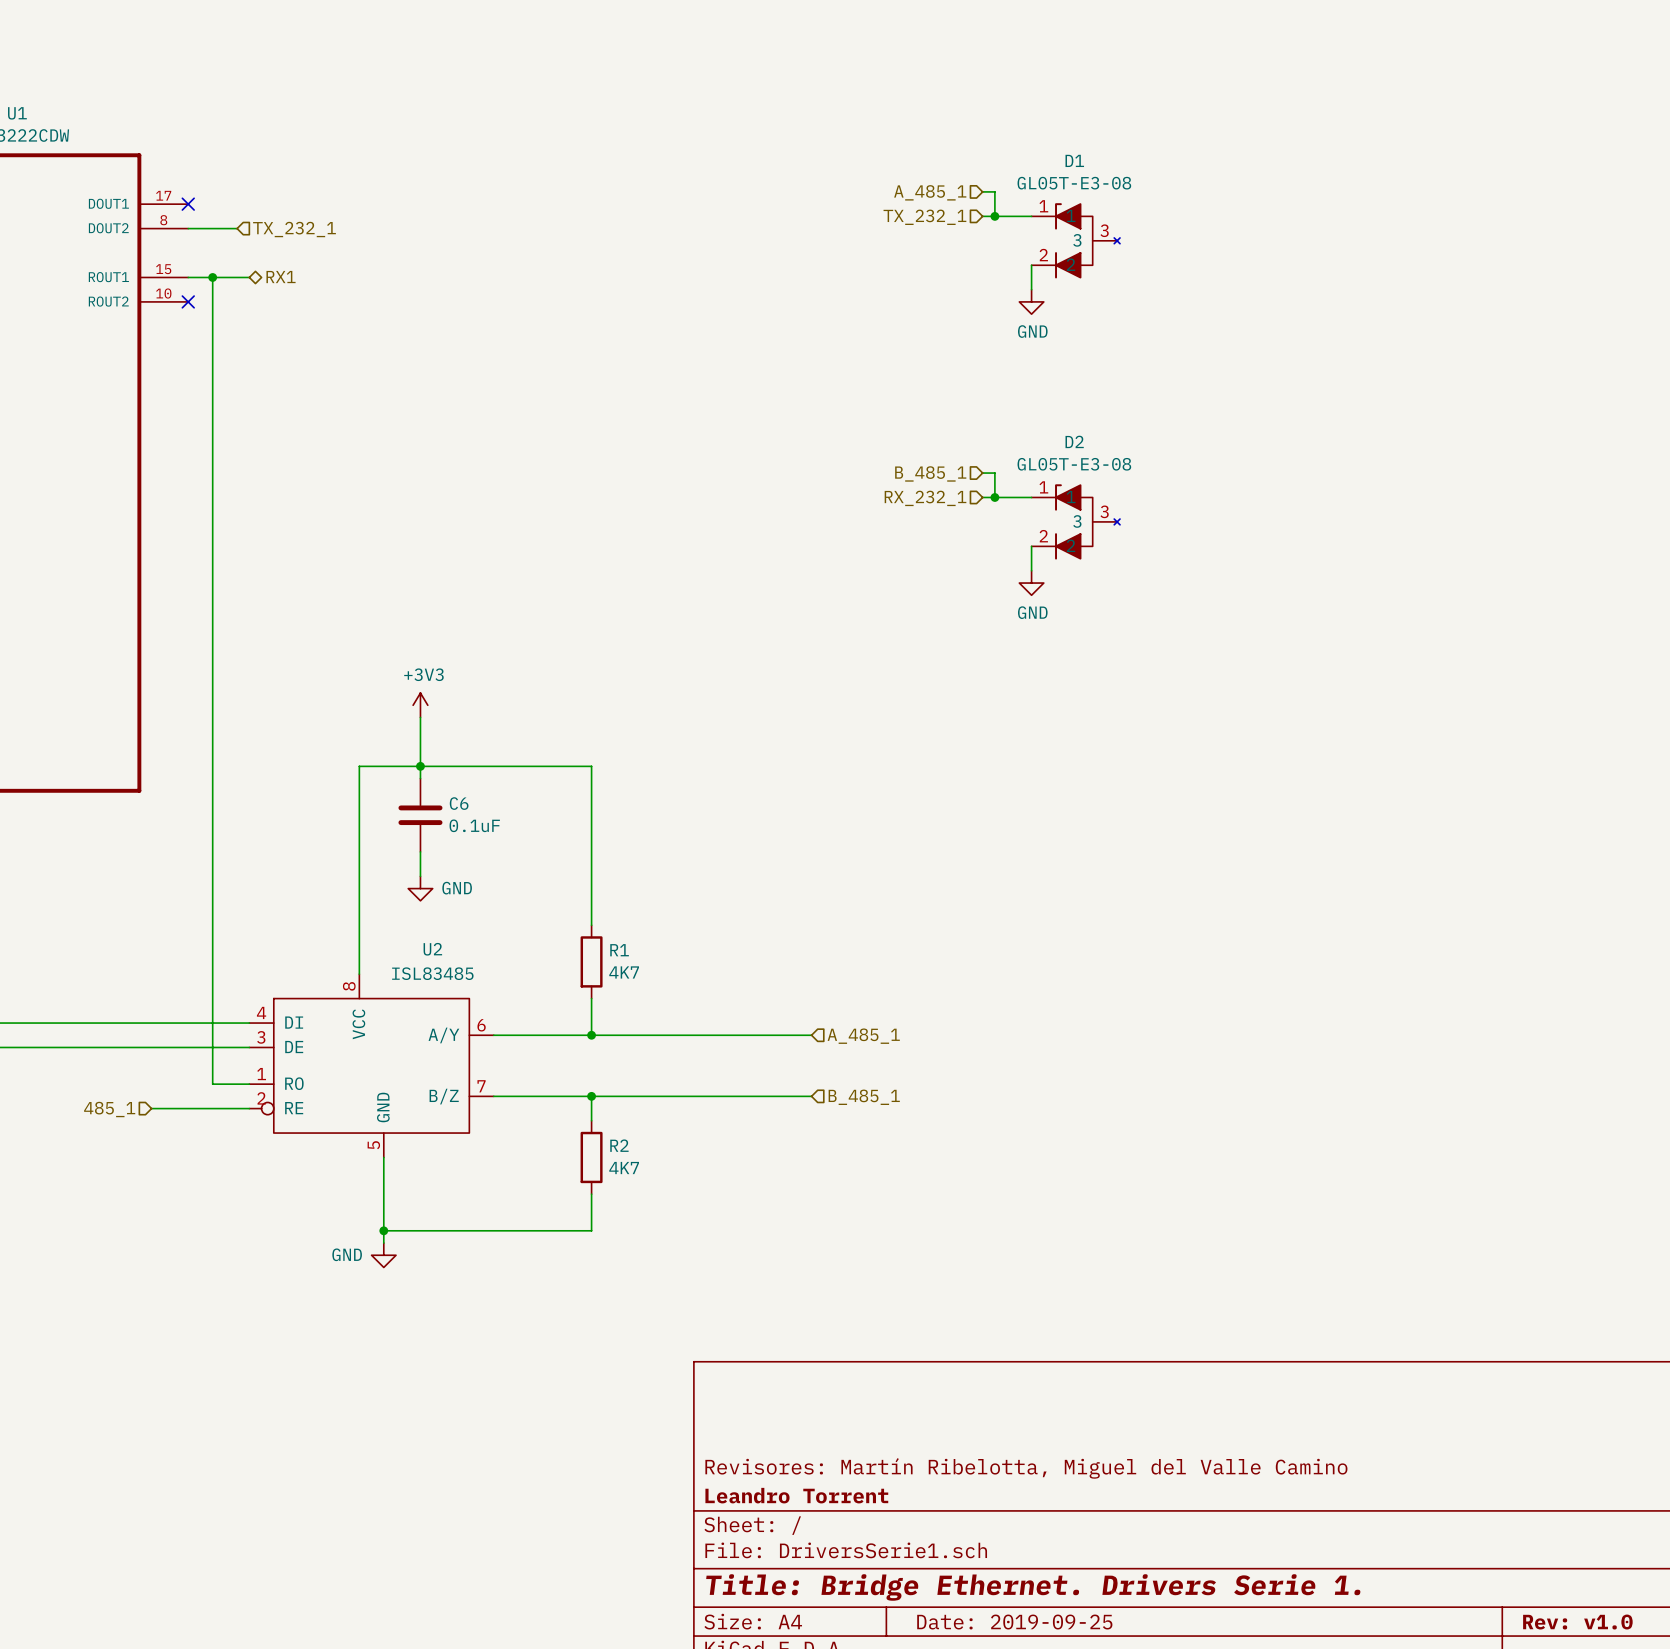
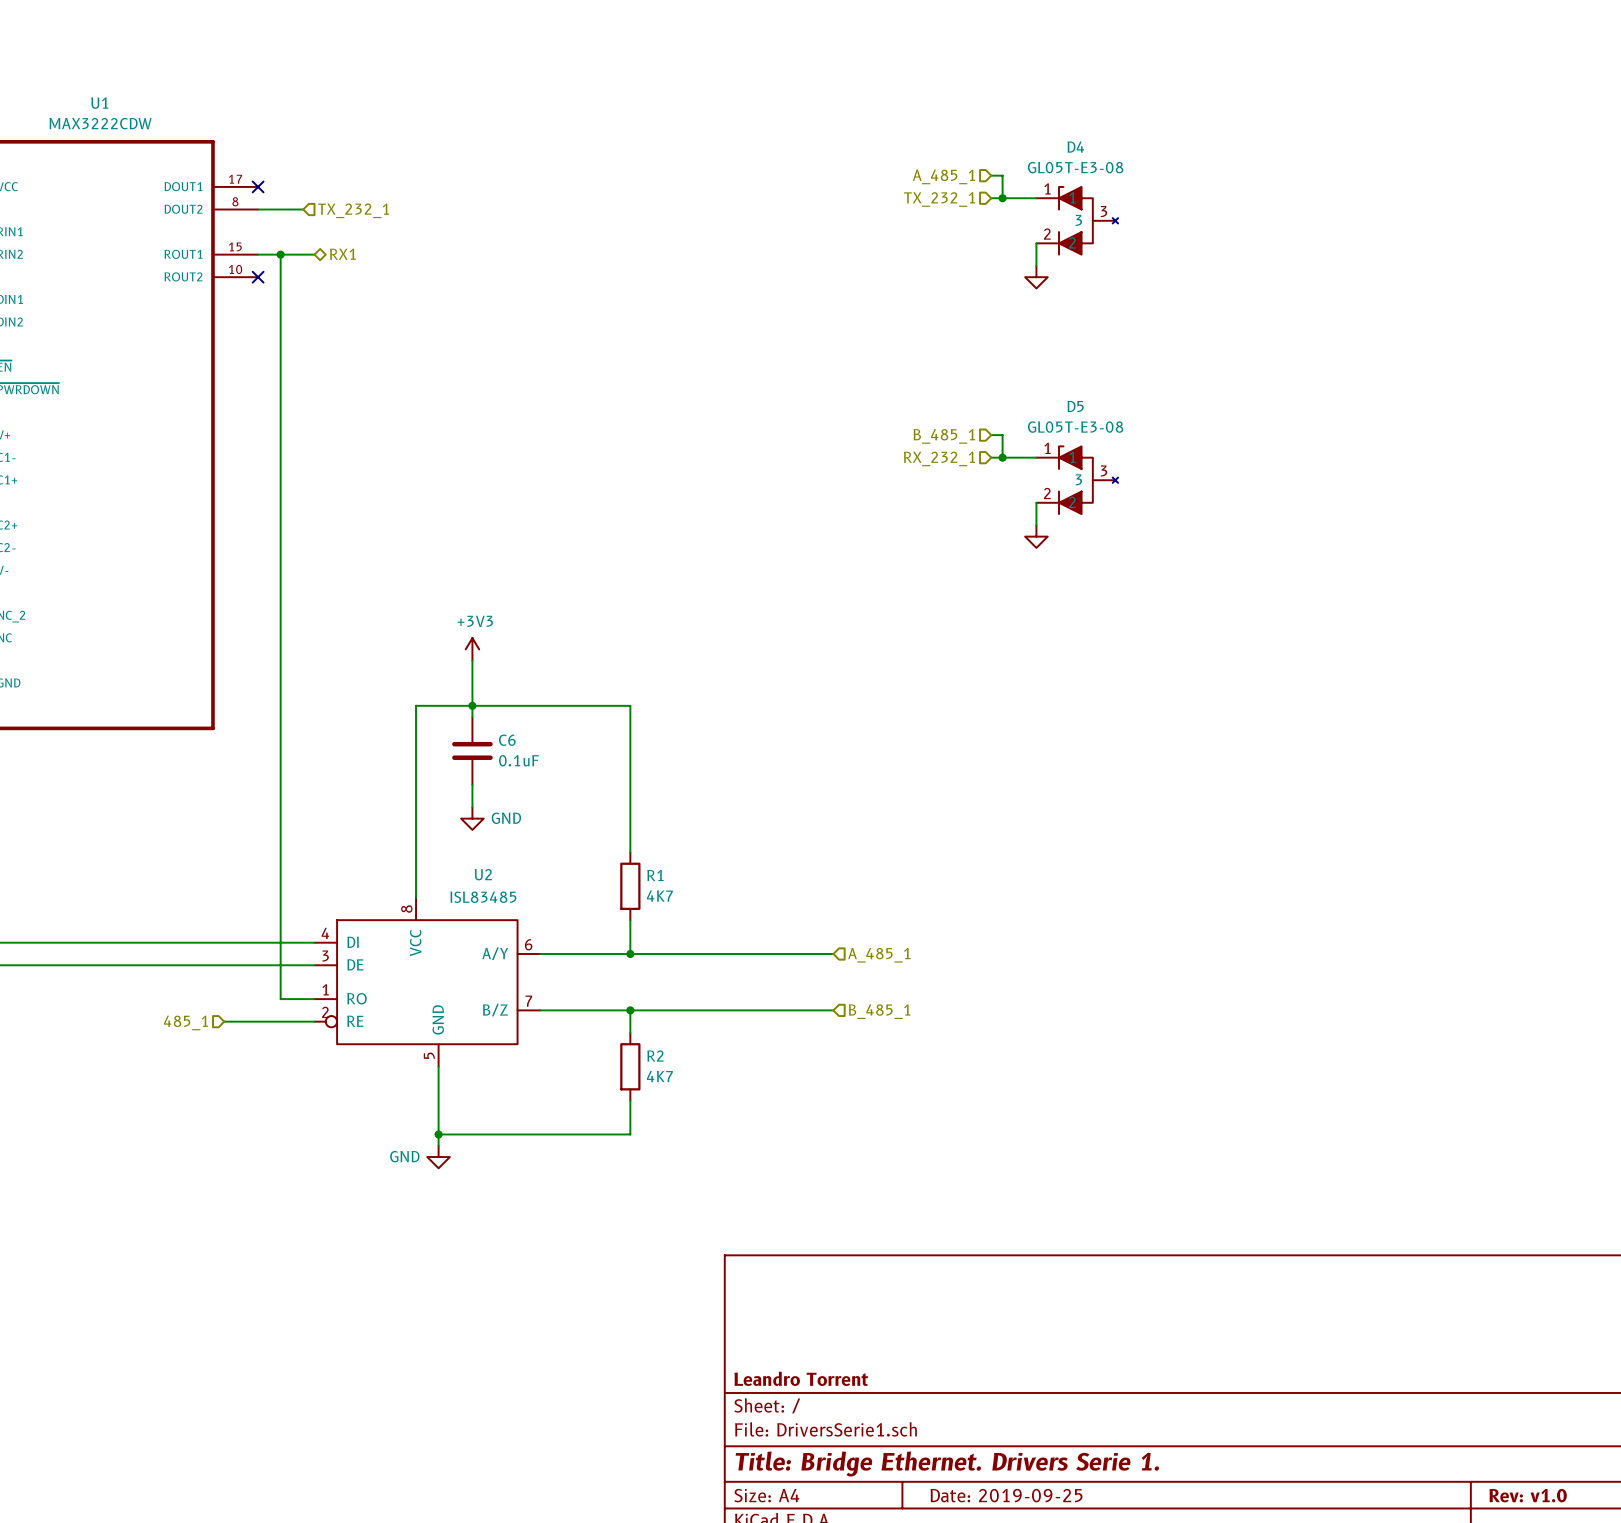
D1 name: D1 (1074, 160) -> D4 (1075, 147)
power symbol text: GND (1032, 331) -> none
D2 name: D2 (1074, 441) -> D5 (1075, 406)
power symbol text: GND (1032, 612) -> none
title block: Revisores: Martín Ribelotta, Miguel del Valle Camino (1026, 1468) -> none

